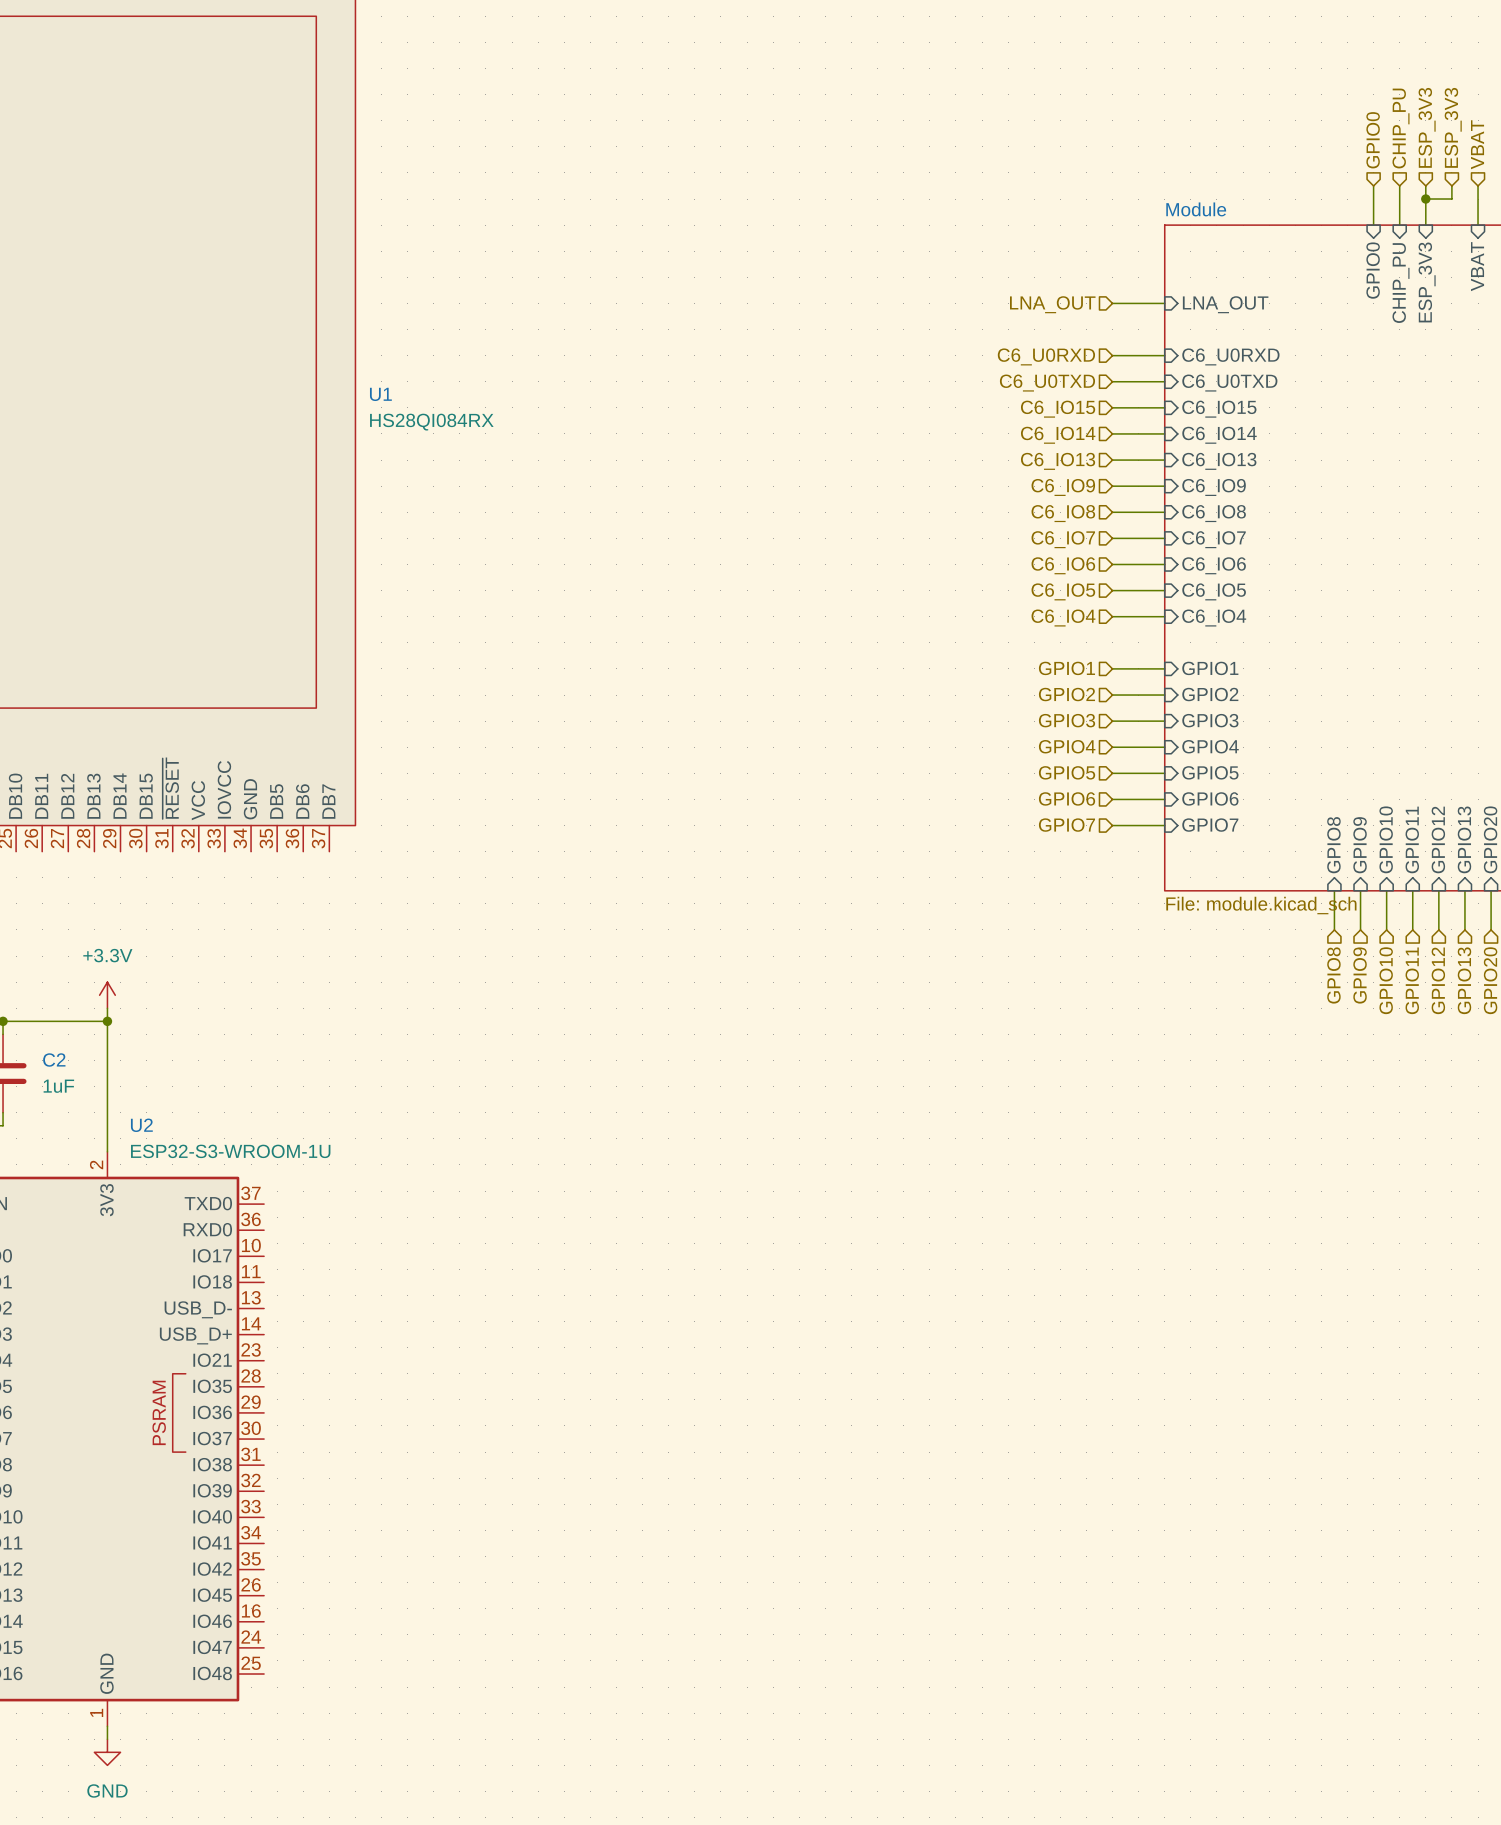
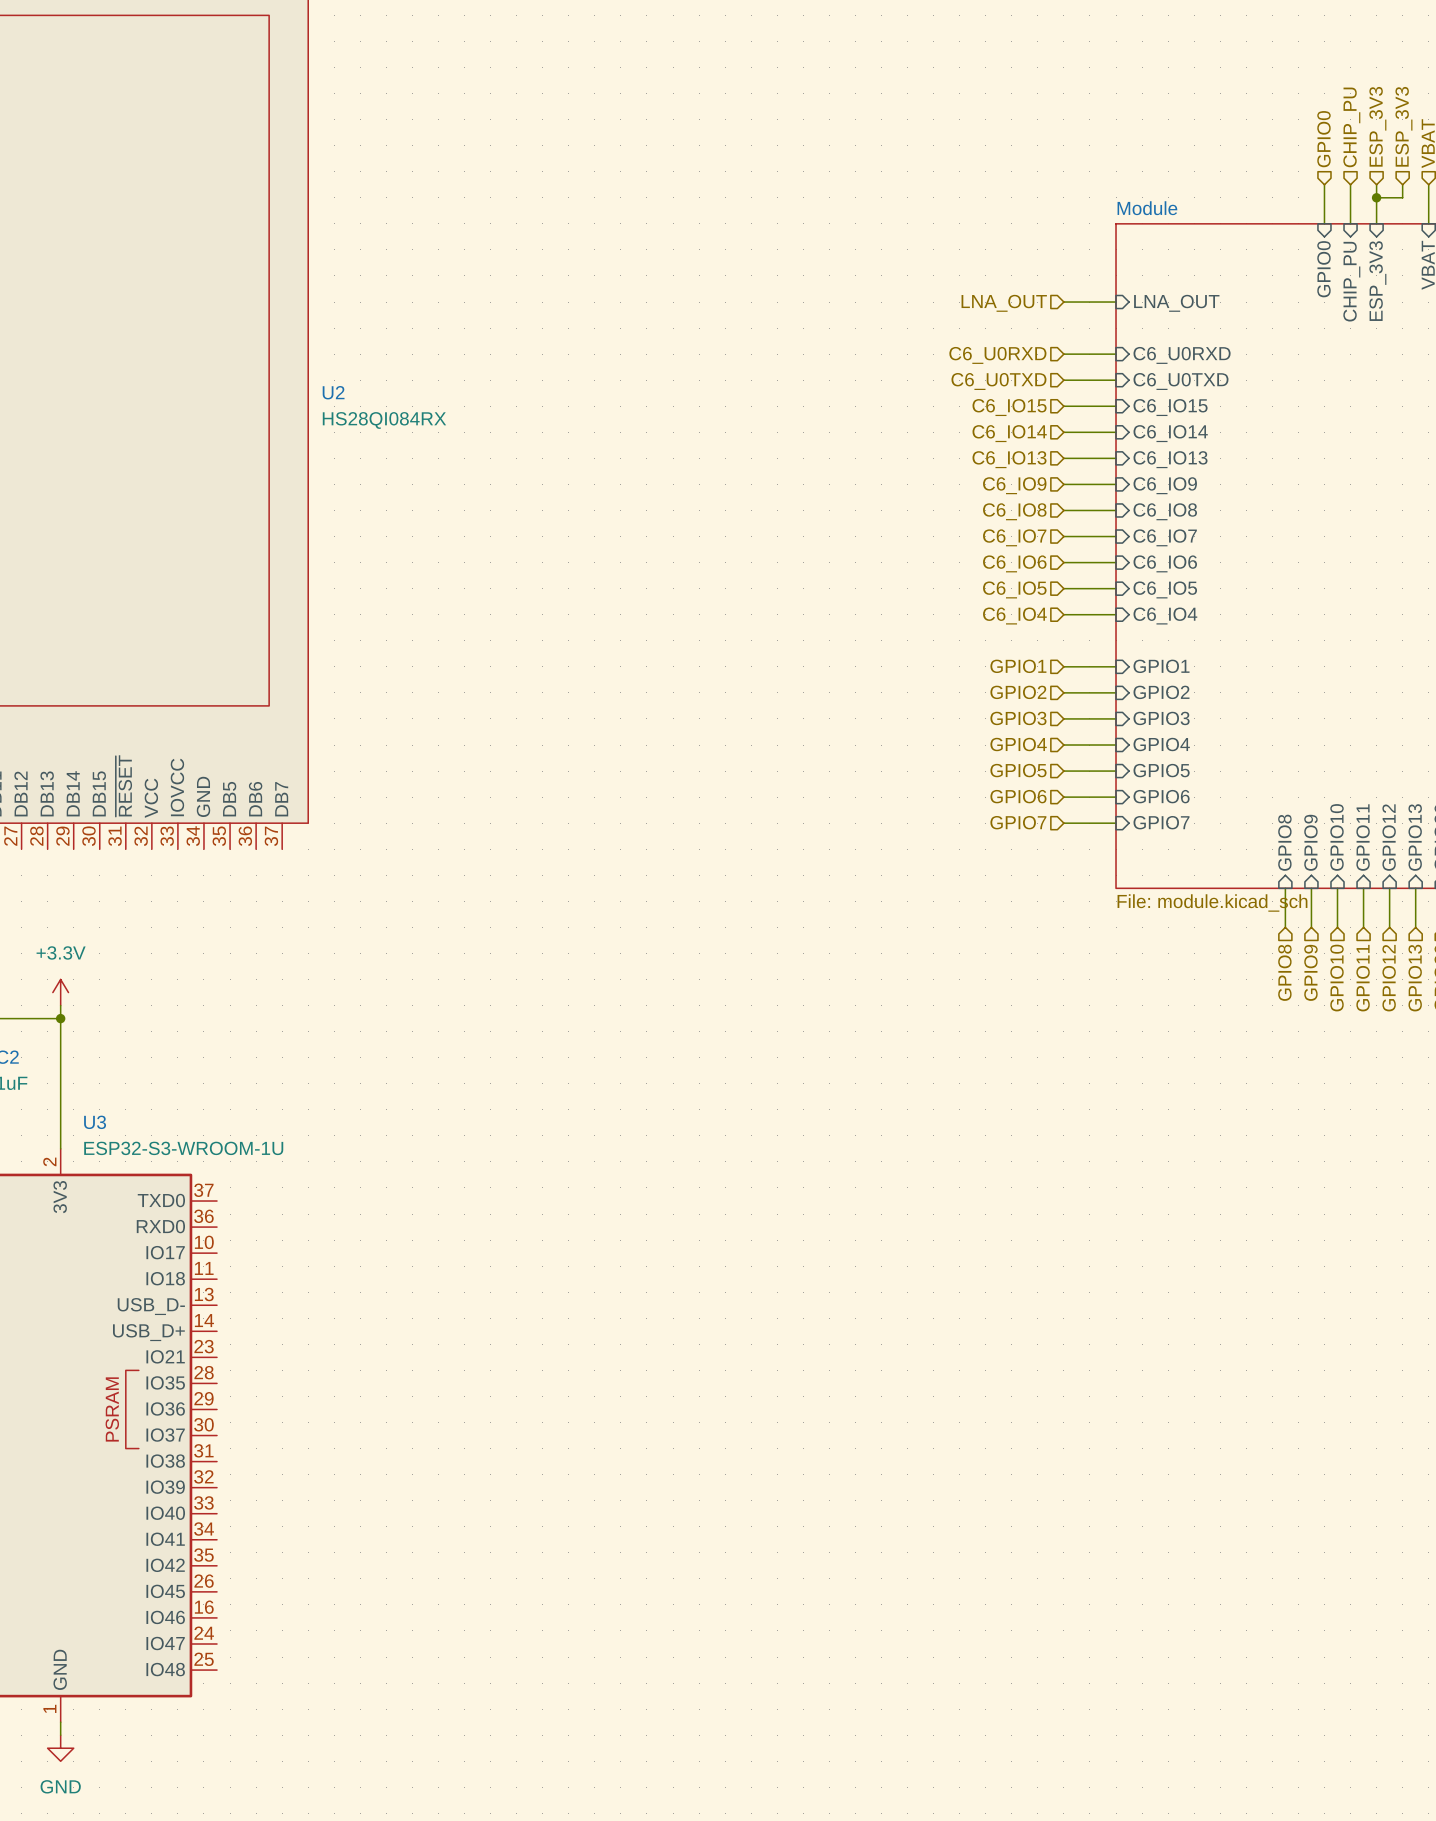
U1 name: U1 (380, 394) -> U2 (333, 392)
U2 name: U2 (141, 1125) -> U3 (95, 1122)

